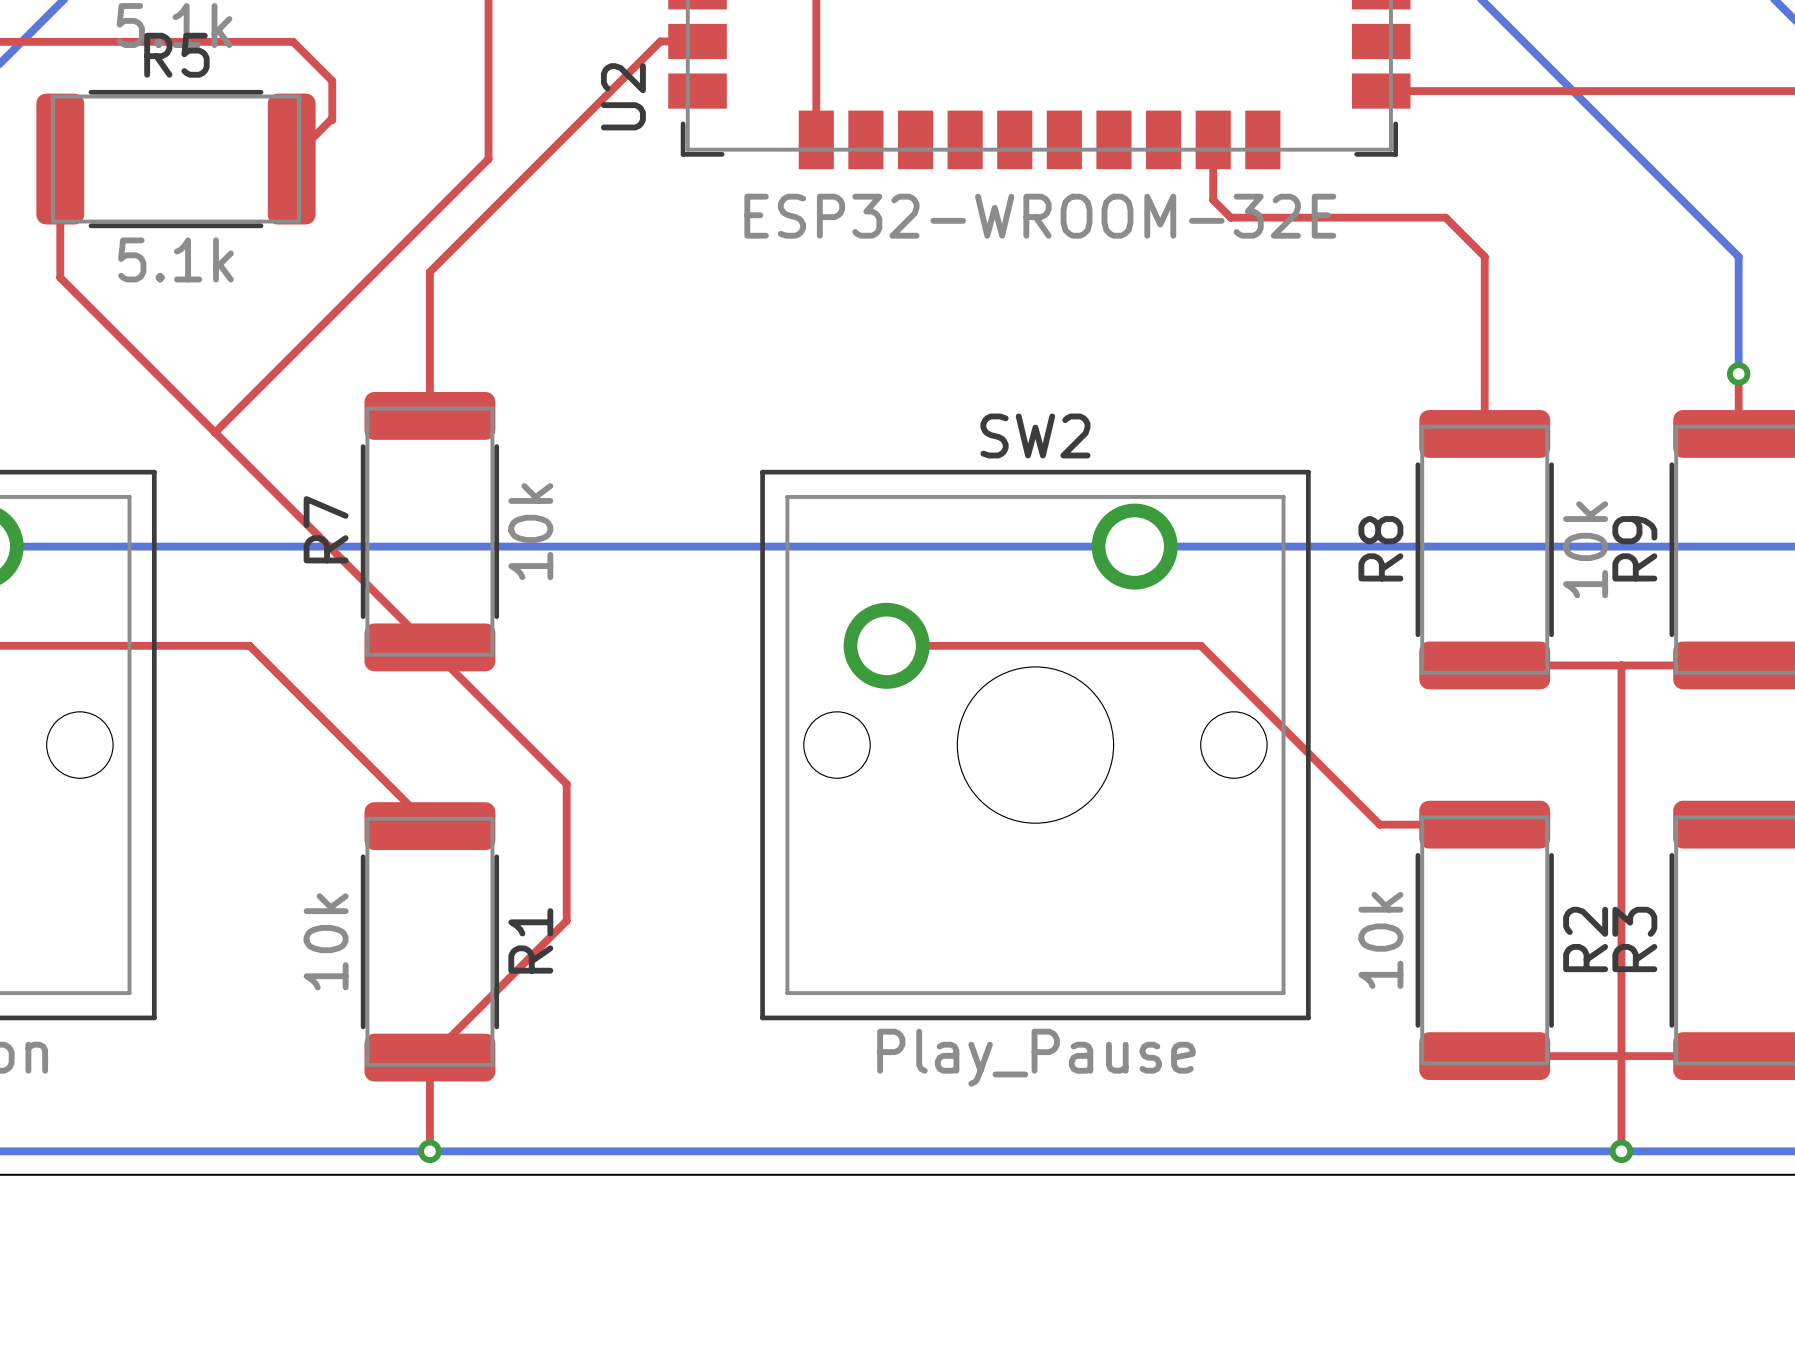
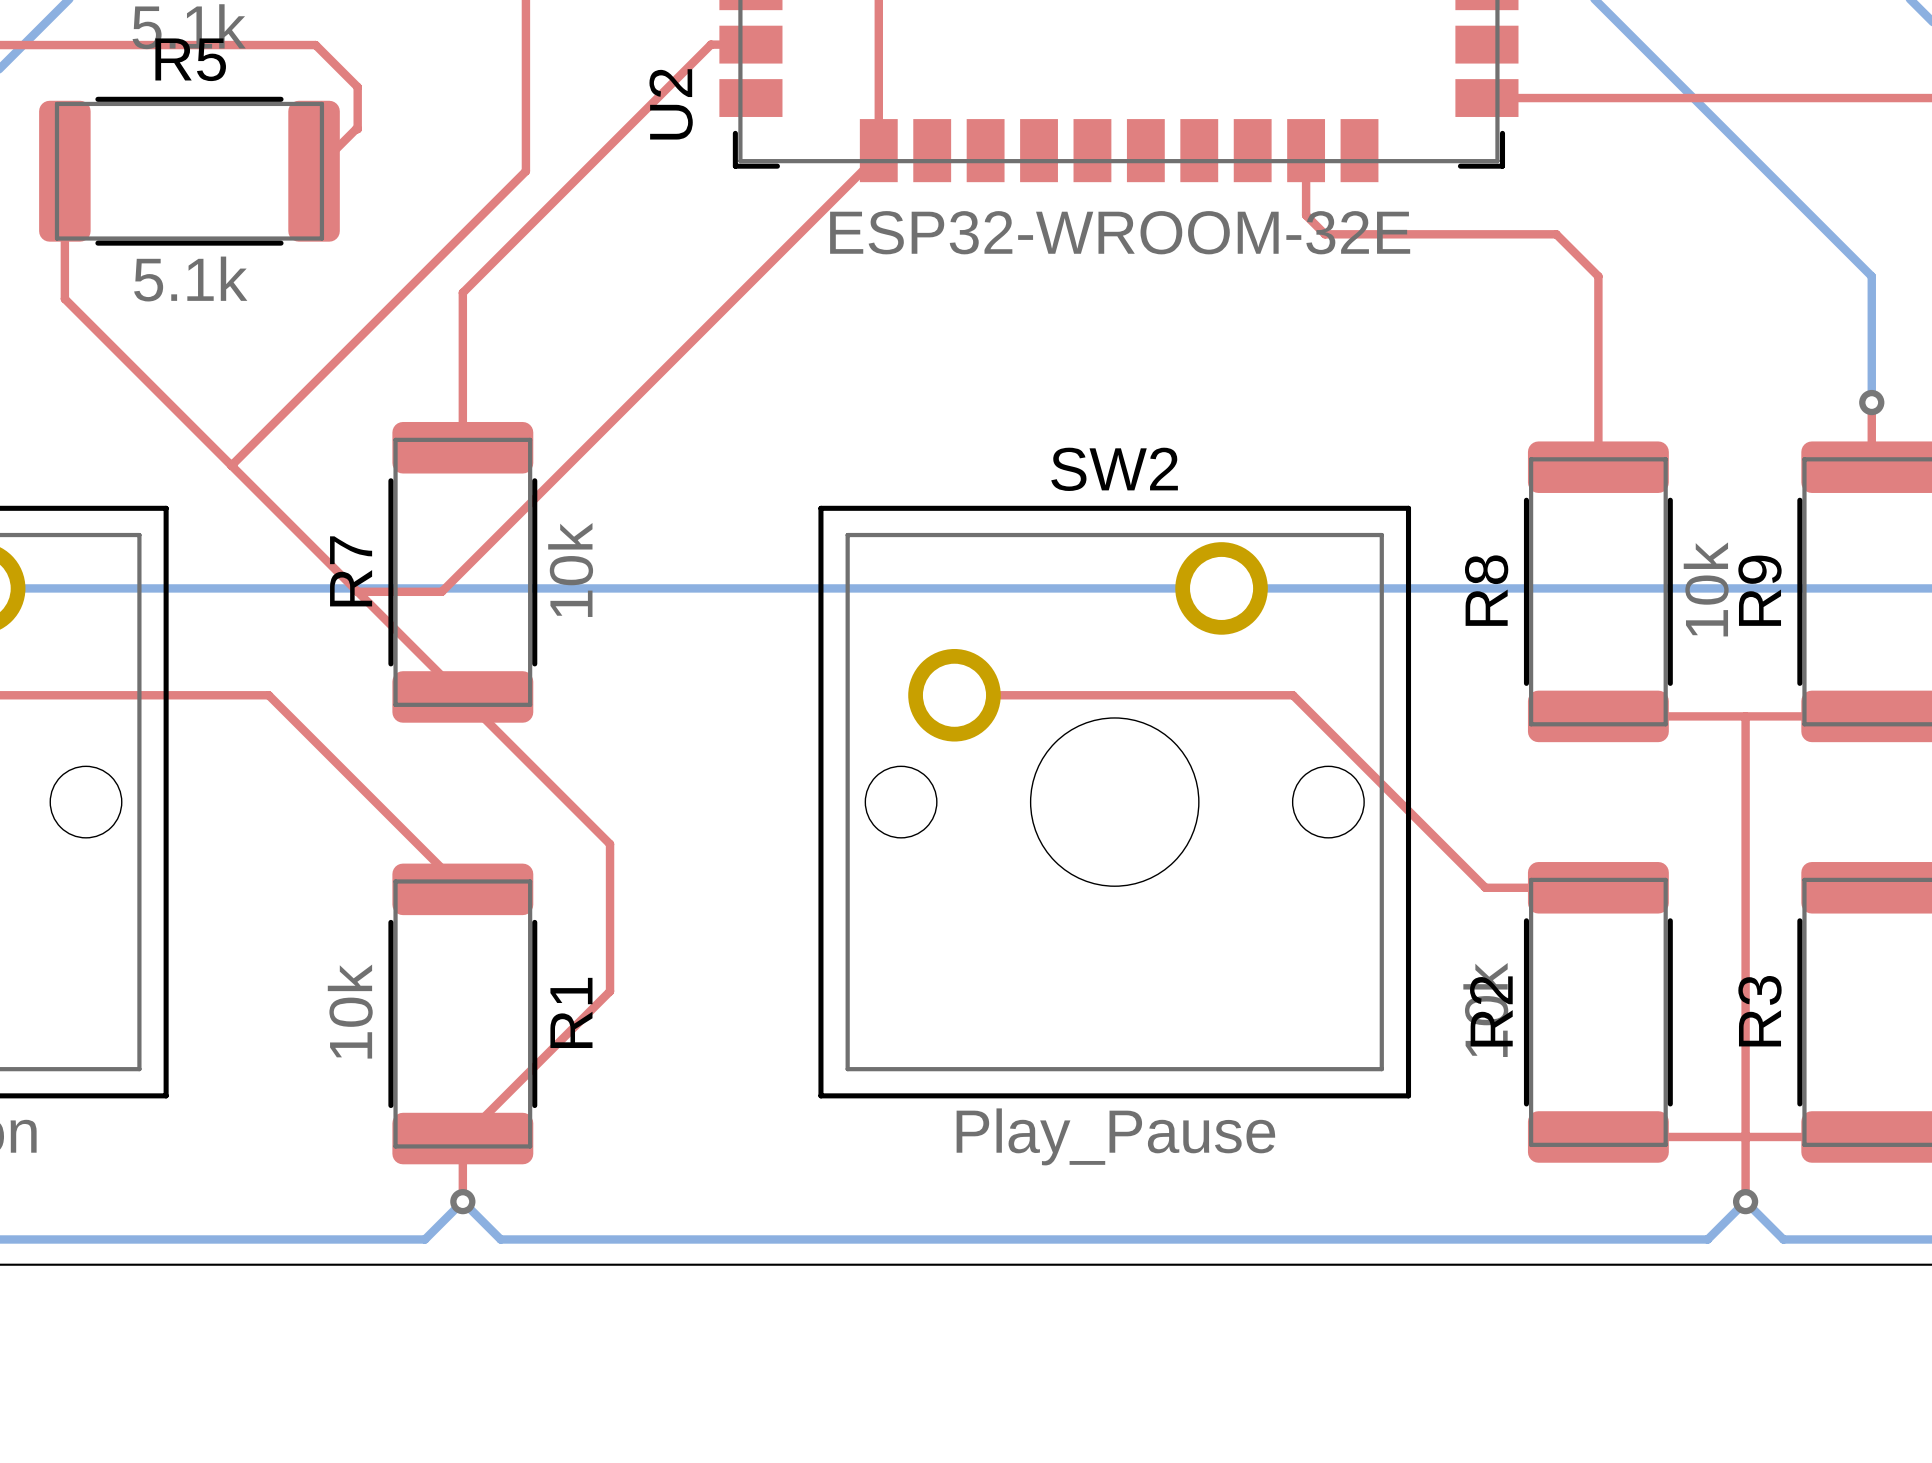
top track: none -> (878, 150) (878, 154) (441, 591) (357, 591)
R2 name position: R2 (1585, 939) -> R2 (1491, 1011)
top track: (429, 1116) (429, 1151) -> none
top track: (1621, 1116) (1621, 1151) -> none
bottom track: (394, 1151) (465, 1151) -> (424, 1239) (462, 1201) (500, 1239)
via position: (429, 1151) -> (462, 1201)
bottom track: (1586, 1151) (1656, 1151) -> (1707, 1239) (1745, 1201) (1783, 1239)
via position: (1621, 1151) -> (1745, 1201)

